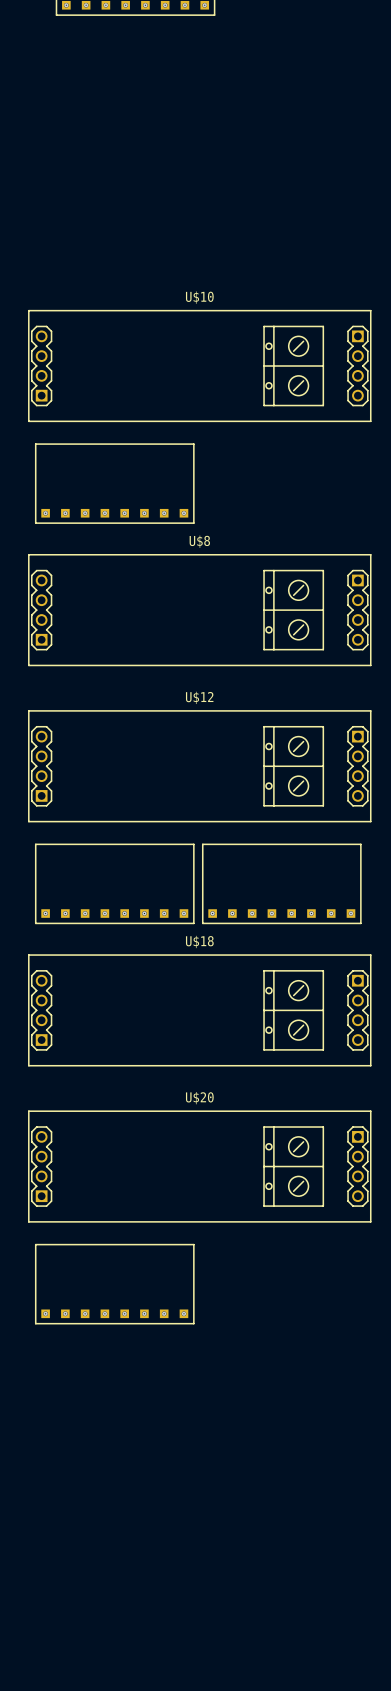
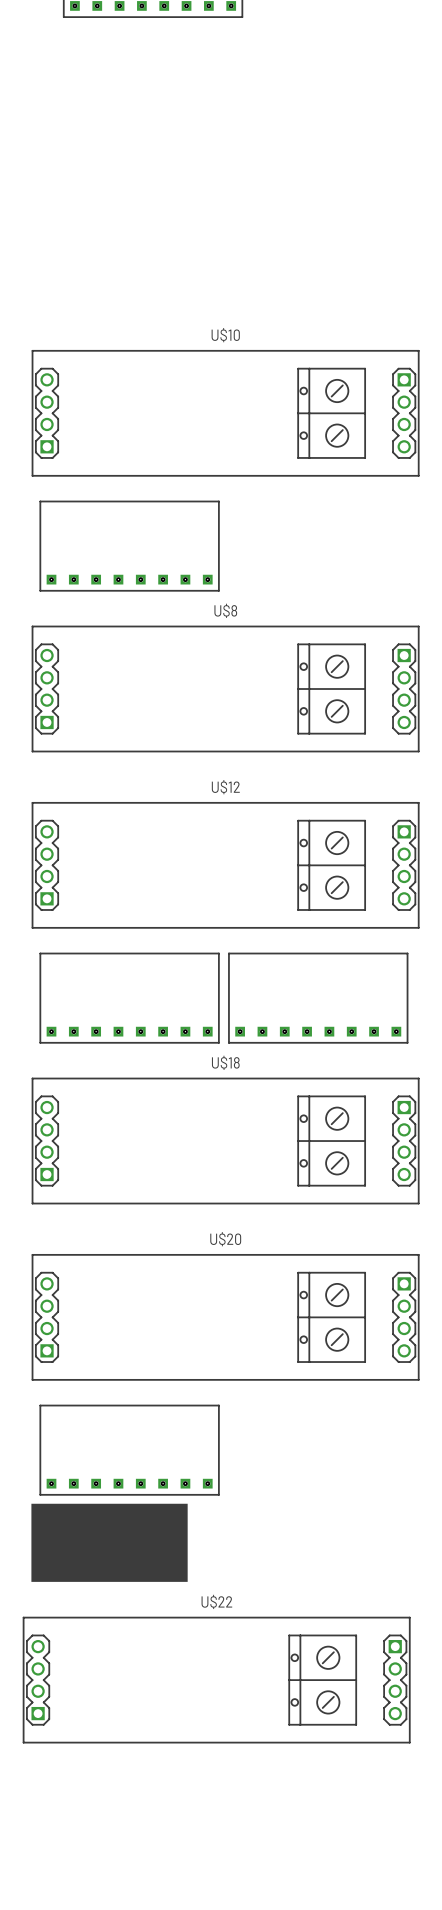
part: none -> (109, 1542)
U$22: none -> (216, 1680)

